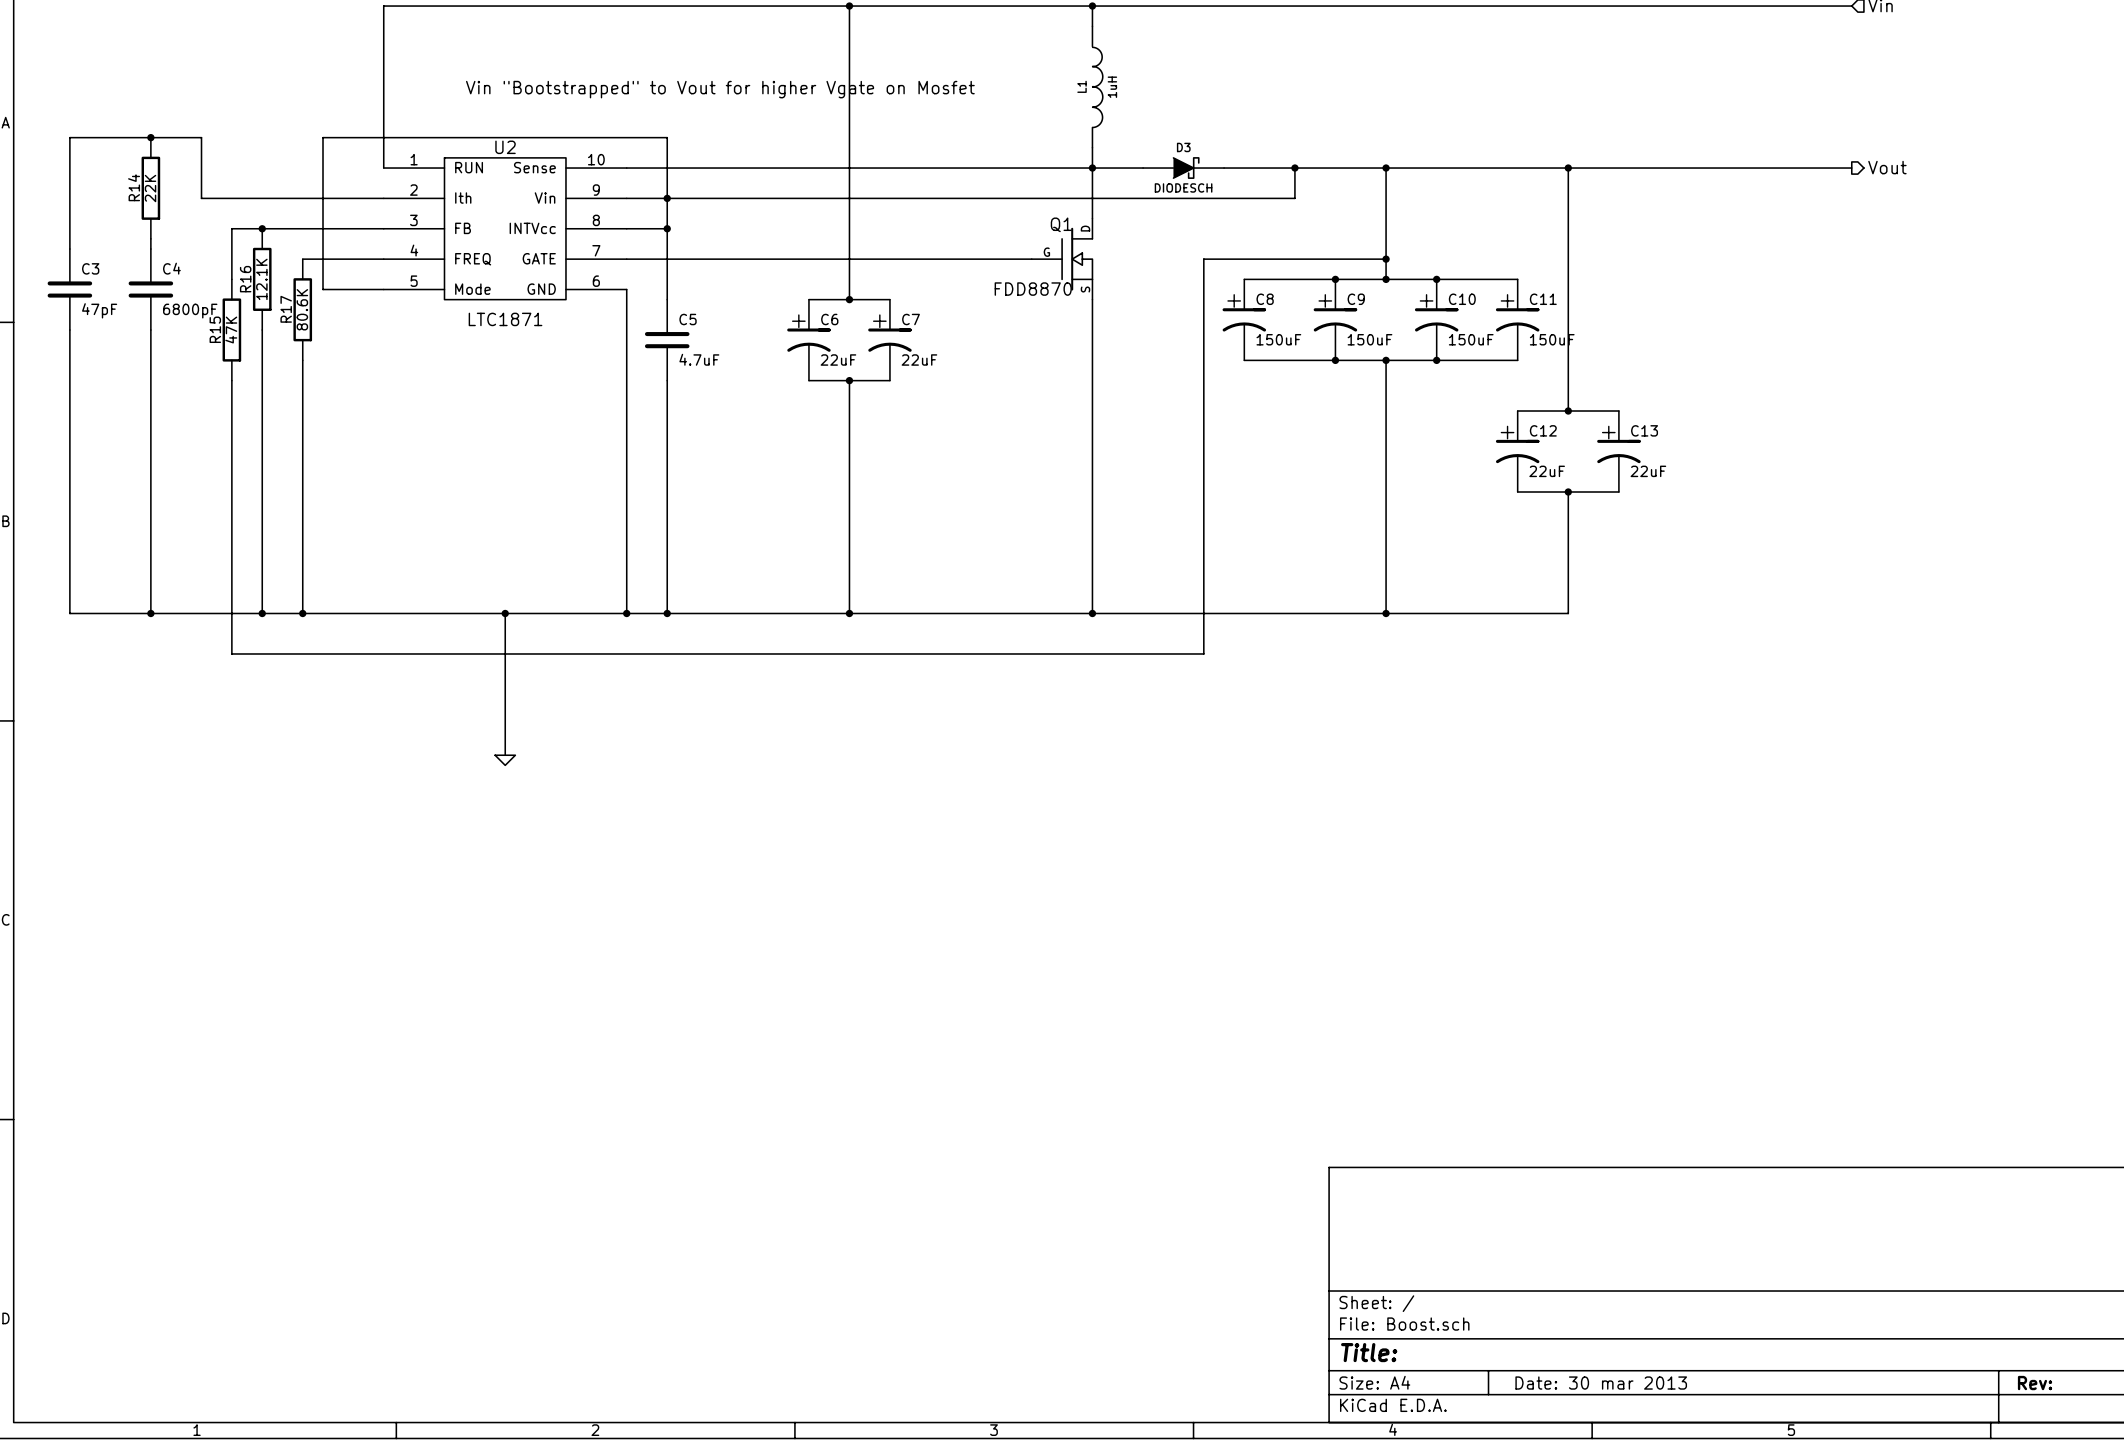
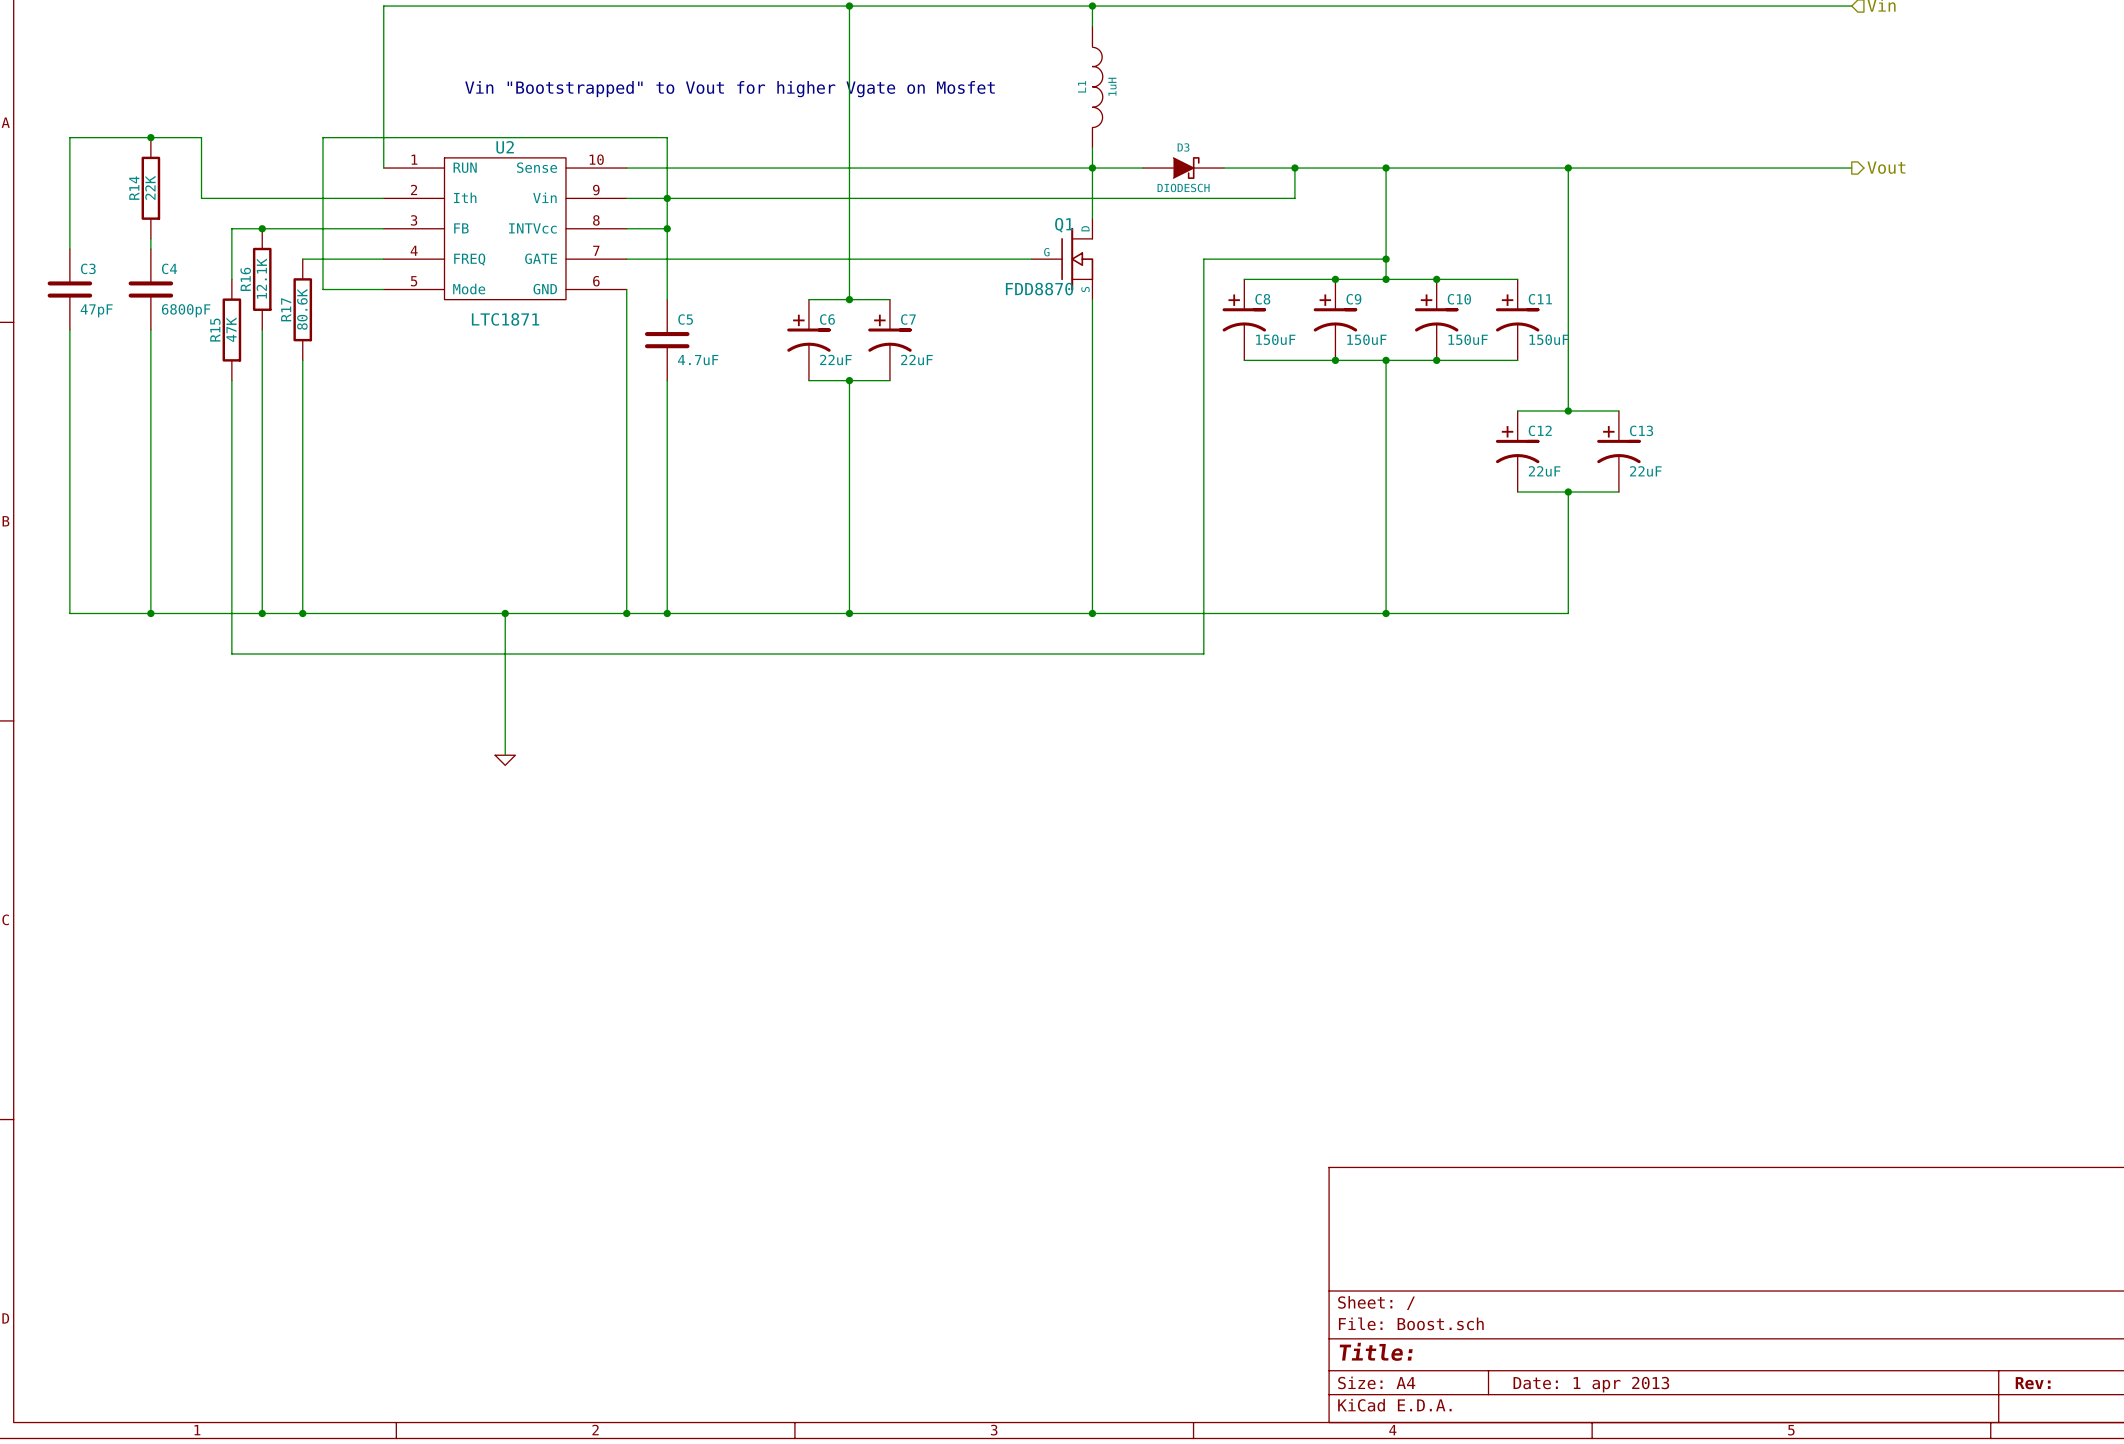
title block: Date: 30 mar 2013 (1601, 1383) -> Date: 1 apr 2013 (1591, 1384)

